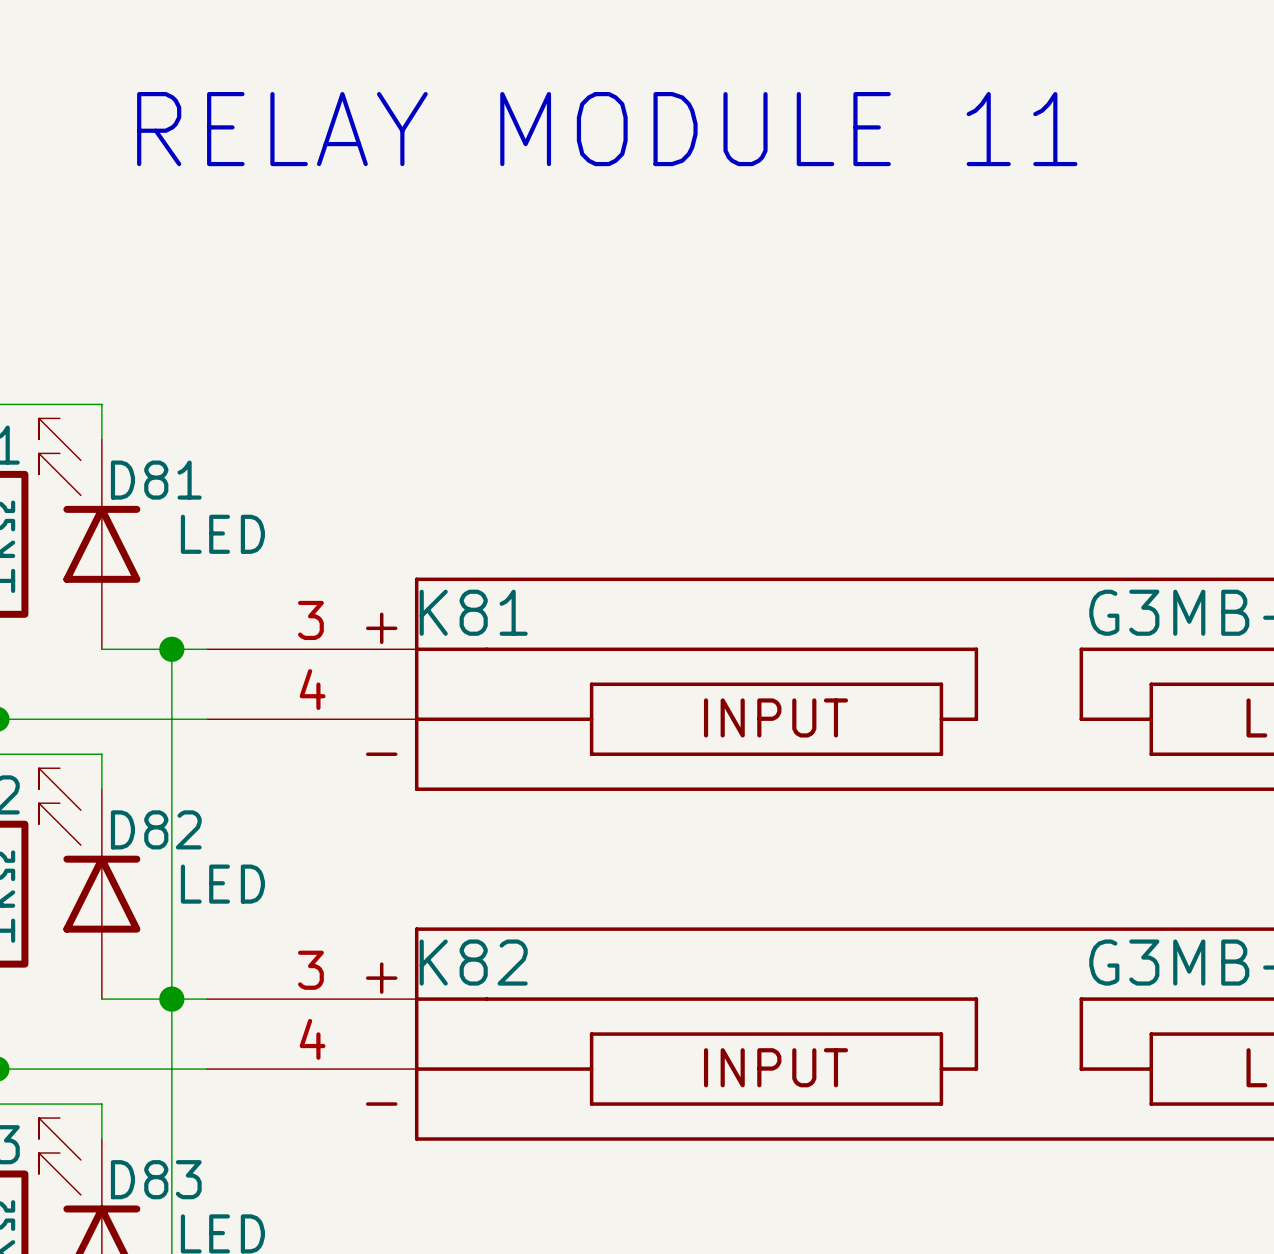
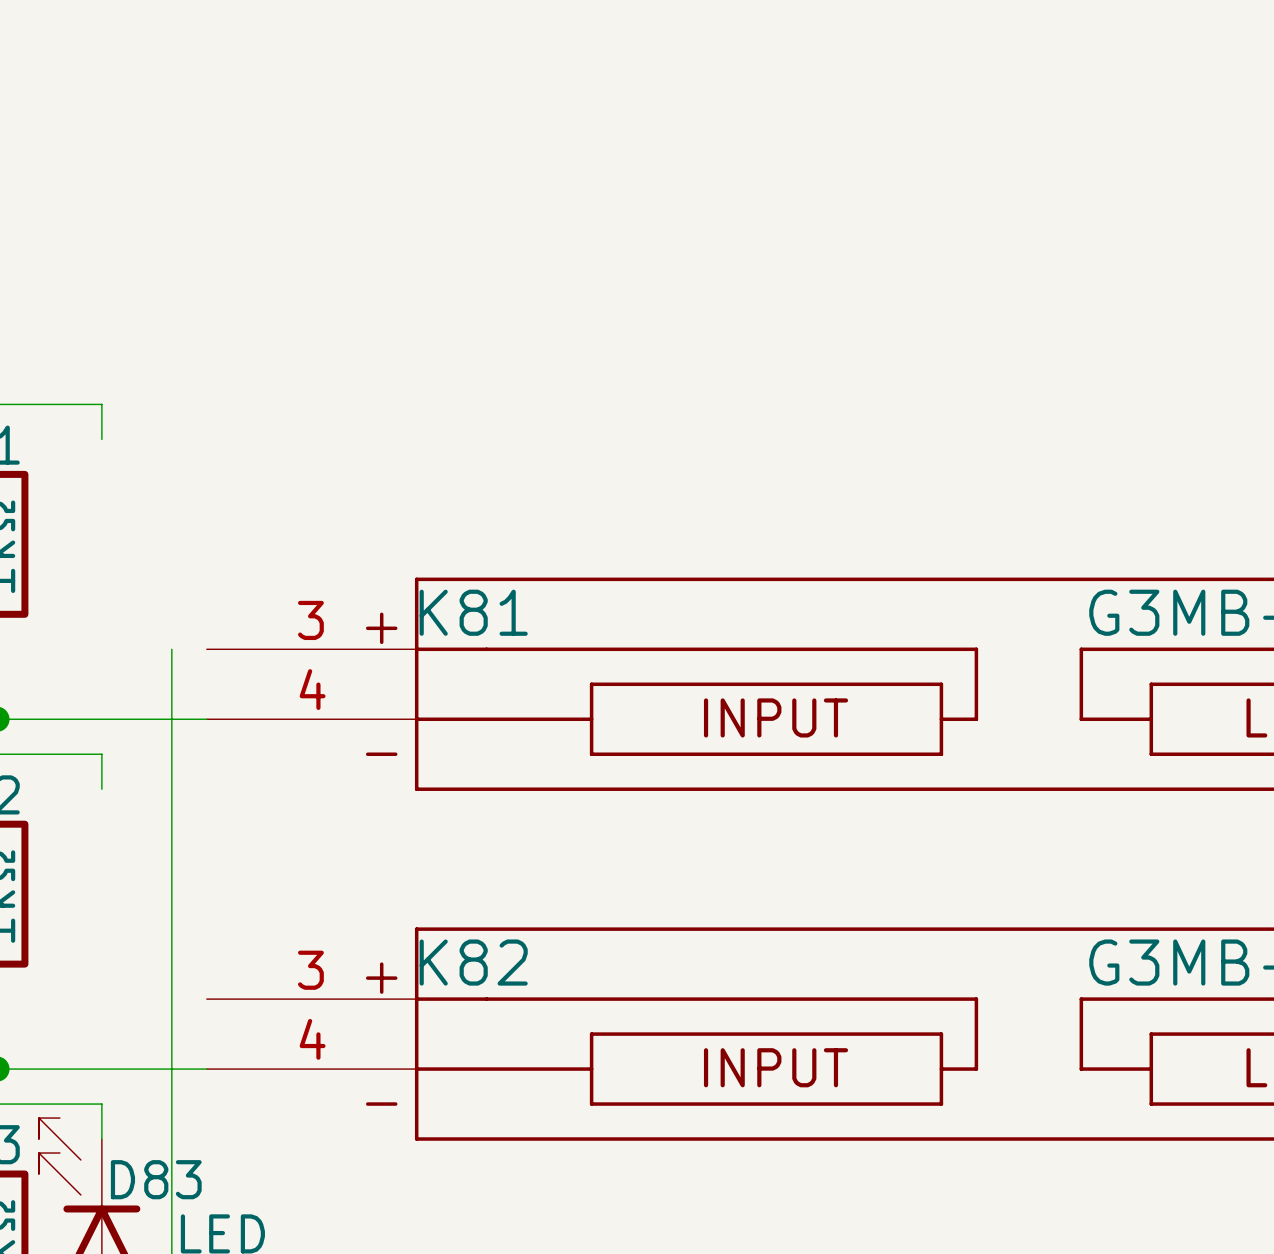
text: RELAY MODULE 11 (607, 129) -> none
D81: LED (89, 533) -> none
wire: (101, 649) (206, 649) -> none
junction: (171, 649) -> none
D82: LED (89, 883) -> none
wire: (101, 999) (206, 999) -> none
junction: (171, 999) -> none

